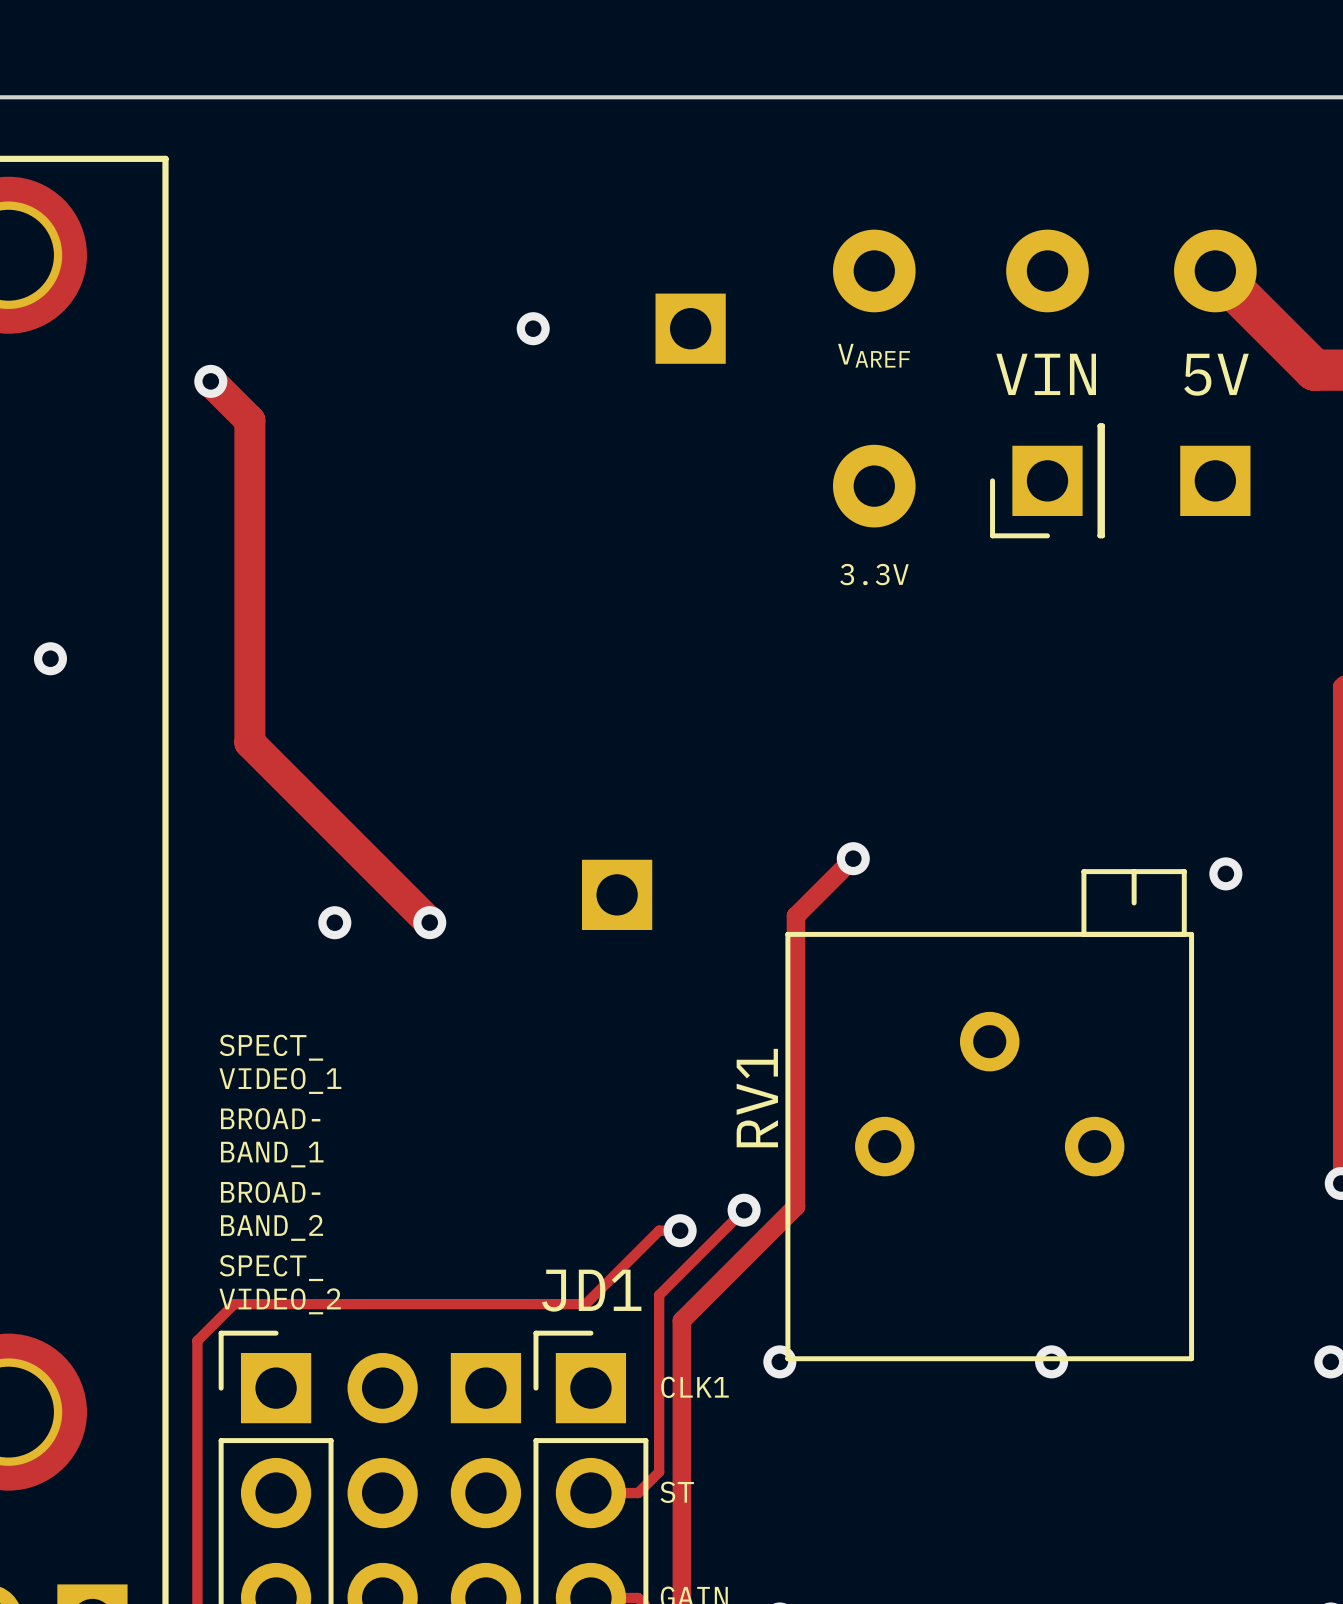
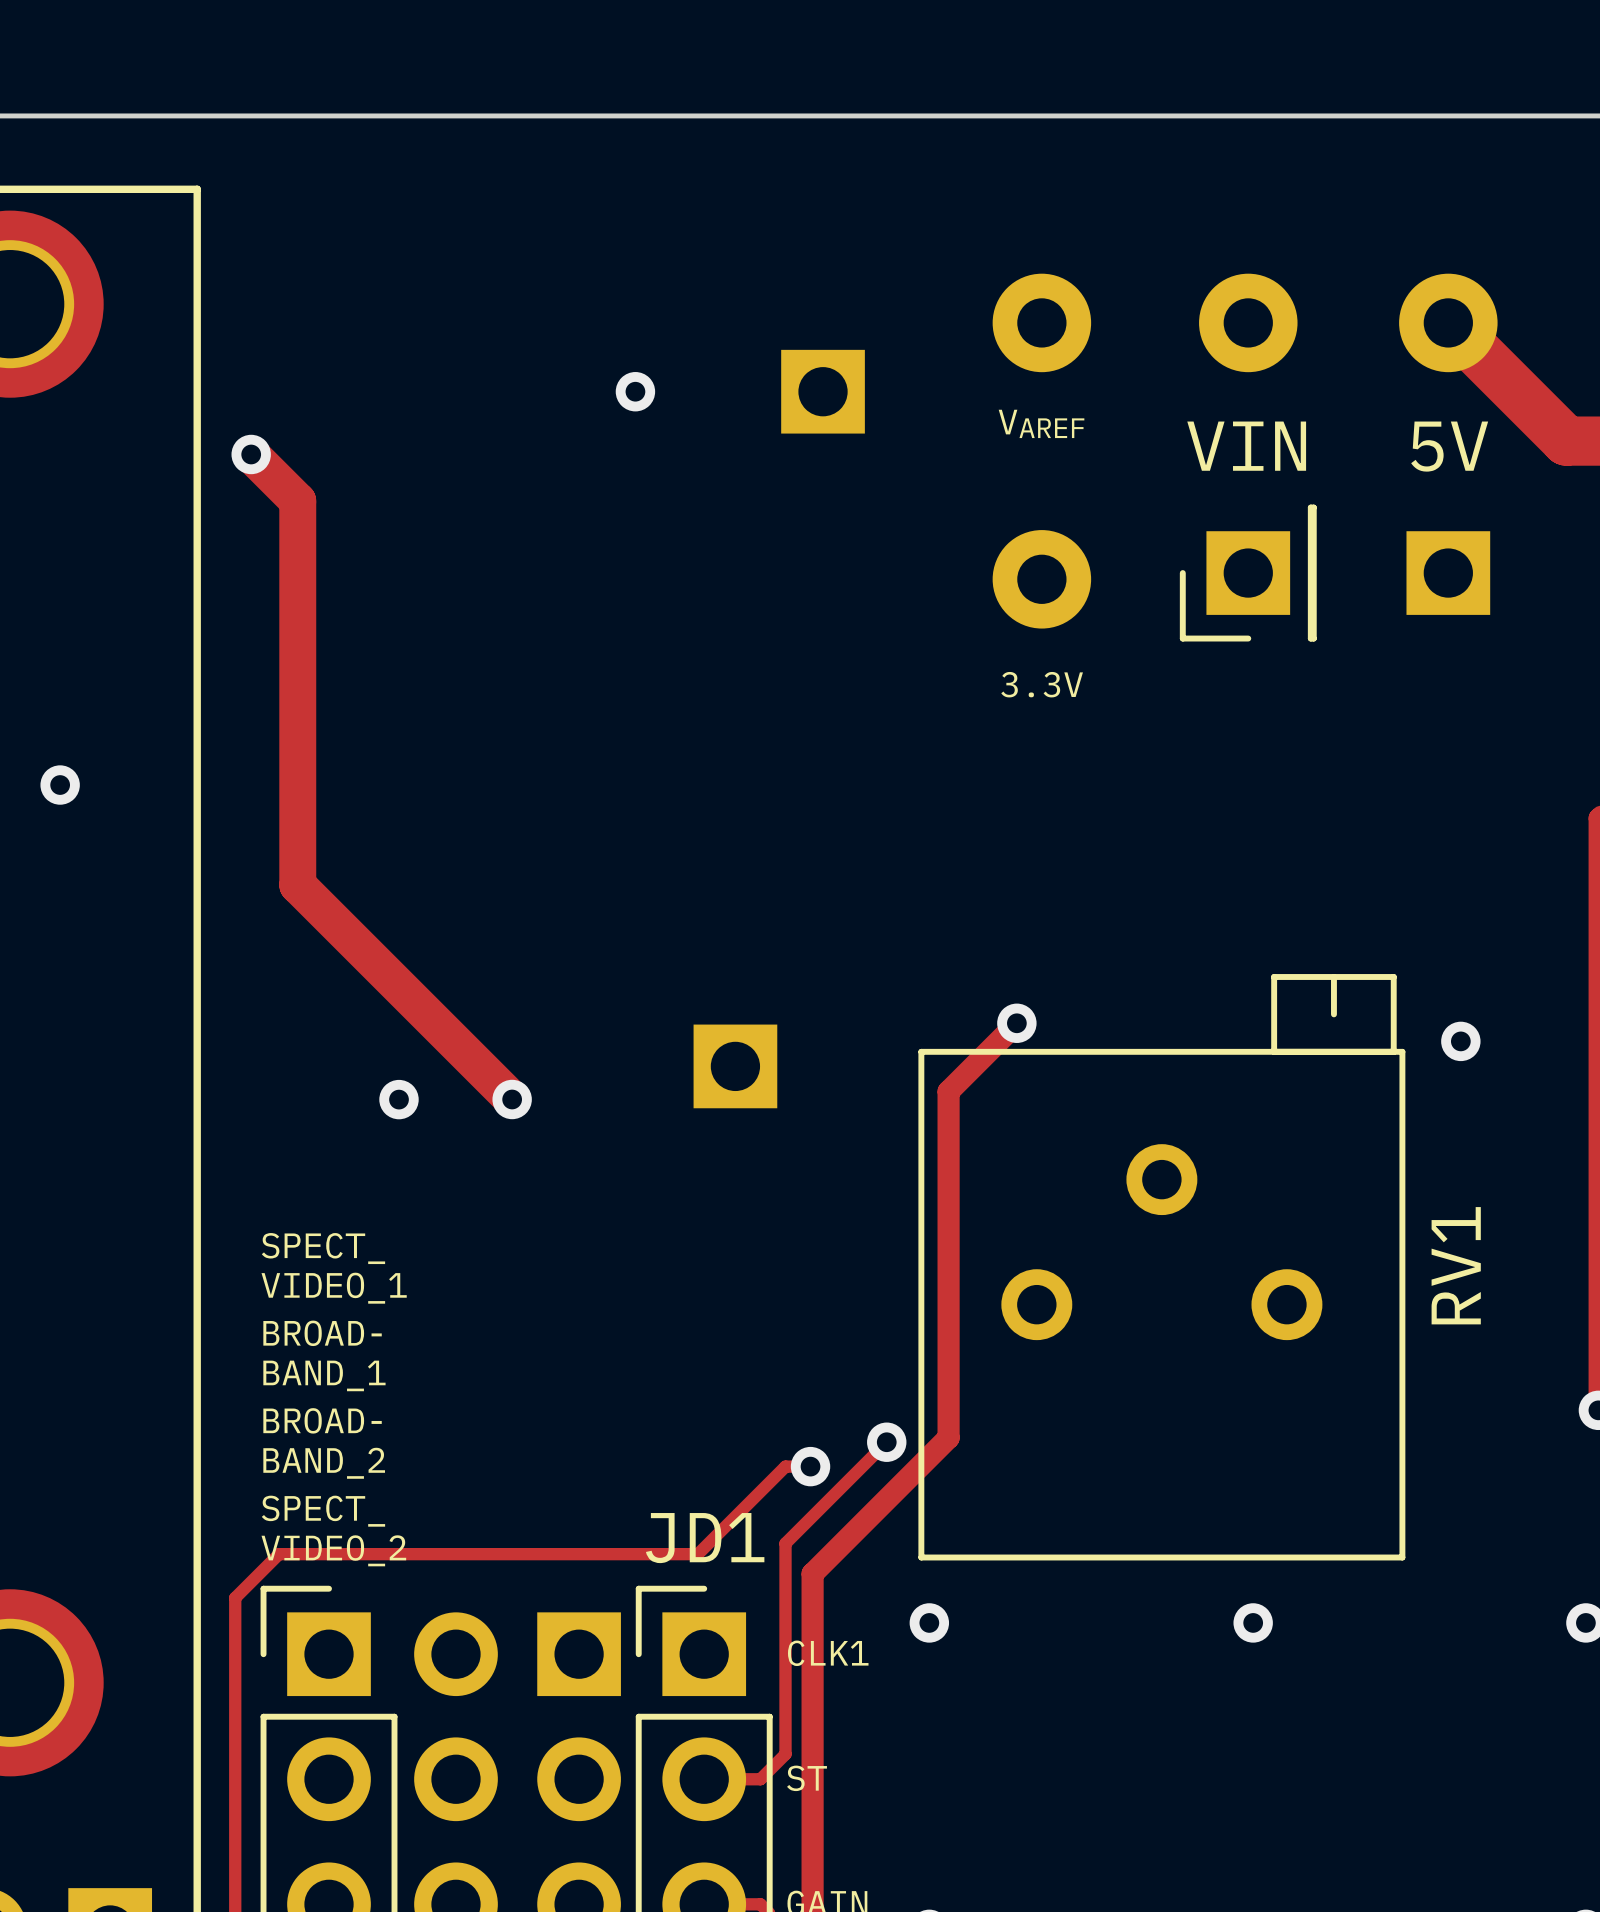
RV1 name position: RV1 (757, 1098) -> RV1 (1456, 1265)
RV1 position: (989, 1115) -> (1161, 1267)

